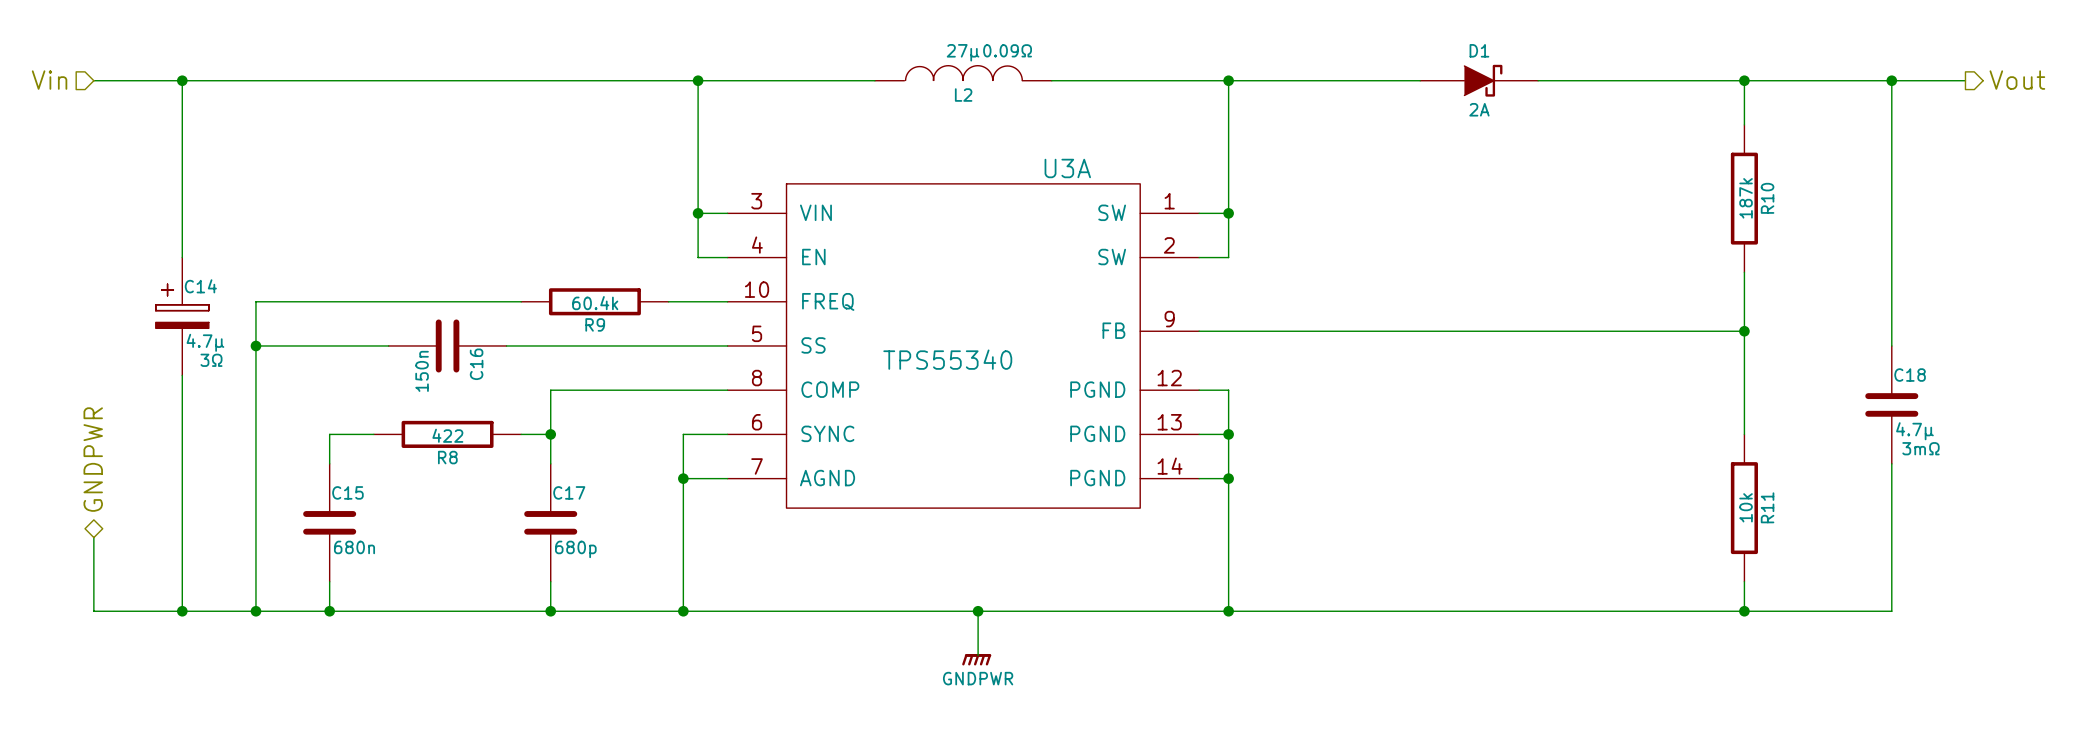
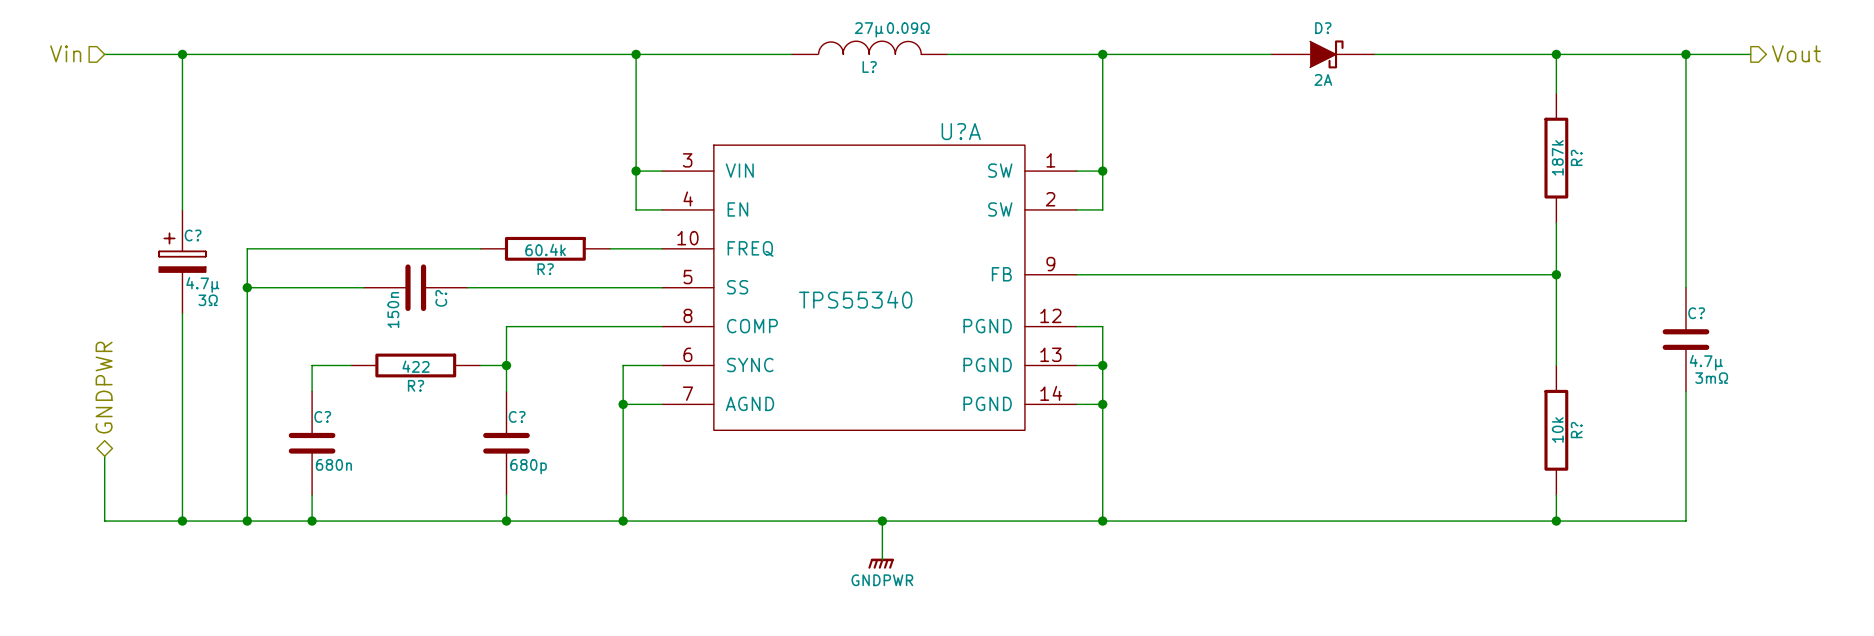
D1 name: D1 (1479, 50) -> D? (1323, 28)
L2 name: L2 (963, 95) -> L? (869, 66)
U3A name: U3A (1067, 168) -> U?A (961, 131)
R10 name: R10 (1767, 198) -> R? (1576, 157)
C14 name: C14 (200, 286) -> C? (193, 235)
R9 name: R9 (595, 324) -> R? (545, 269)
C16 name: C16 (476, 364) -> C? (441, 298)
C18 name: C18 (1910, 375) -> C? (1696, 313)
R8 name: R8 (447, 457) -> R? (416, 385)
C15 name: C15 (347, 492) -> C? (322, 416)
C17 name: C17 (569, 492) -> C? (517, 416)
R11 name: R11 (1767, 507) -> R? (1576, 430)

